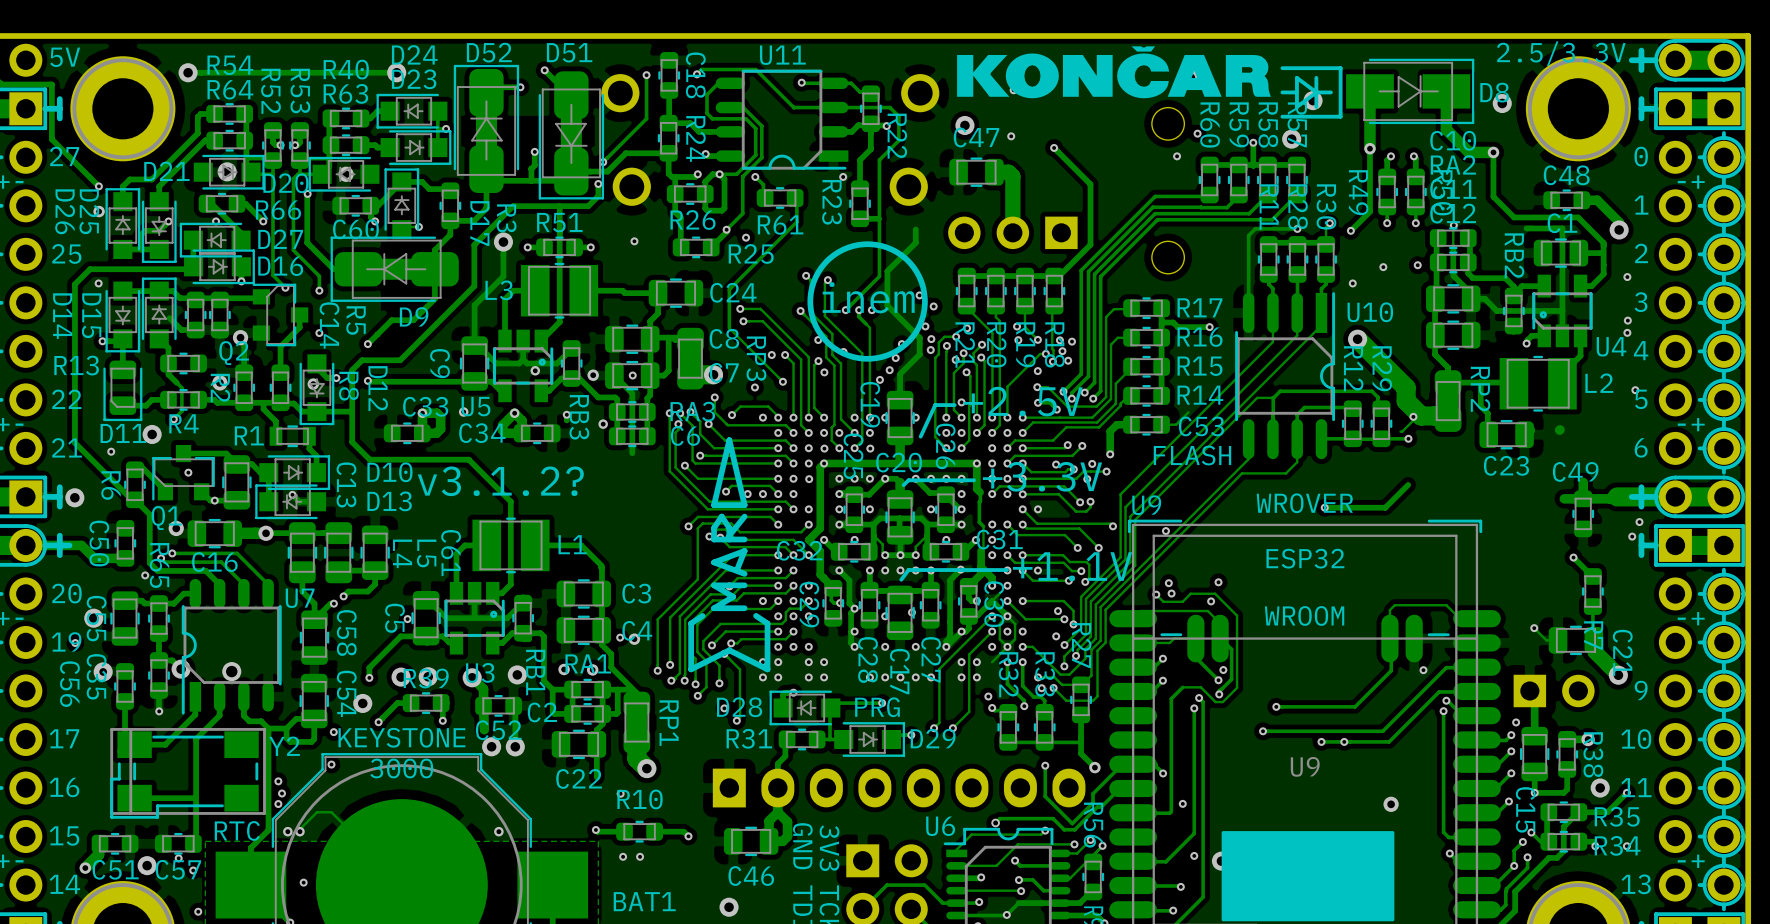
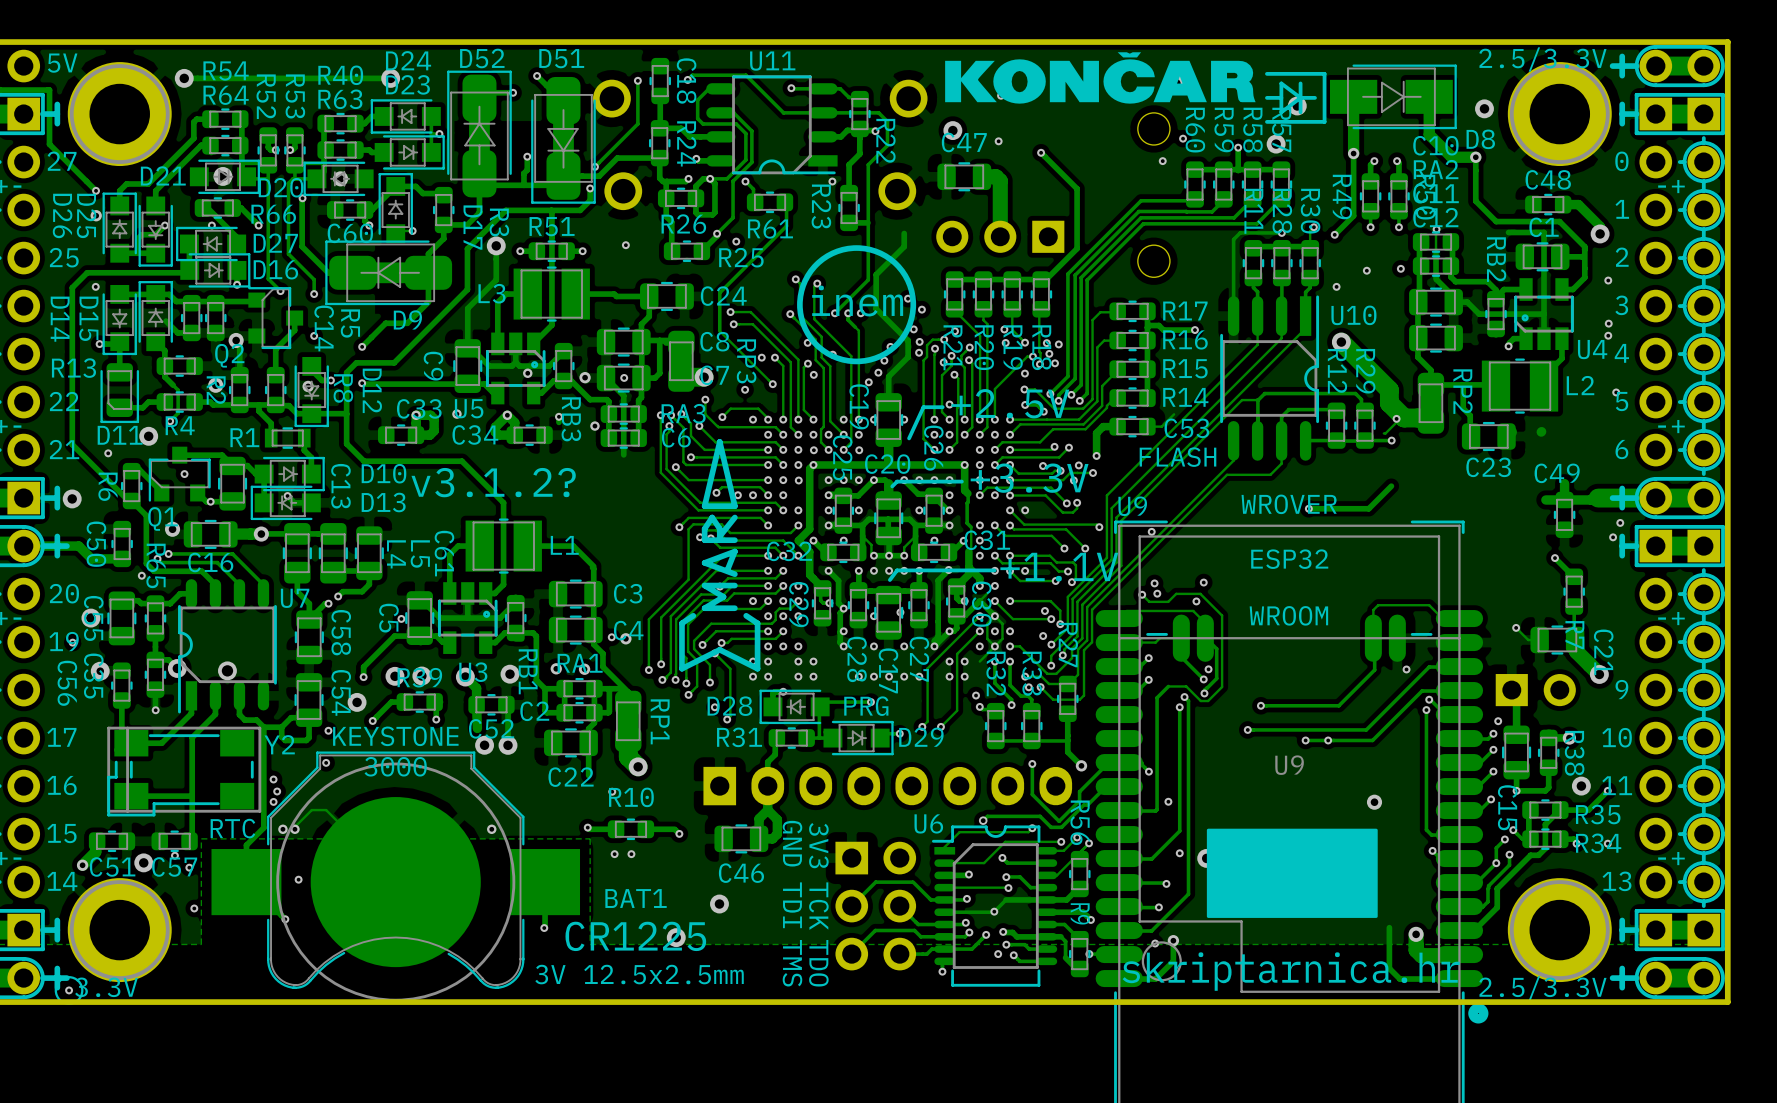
D8 name position: D8 (1494, 92) -> D8 (1480, 139)

